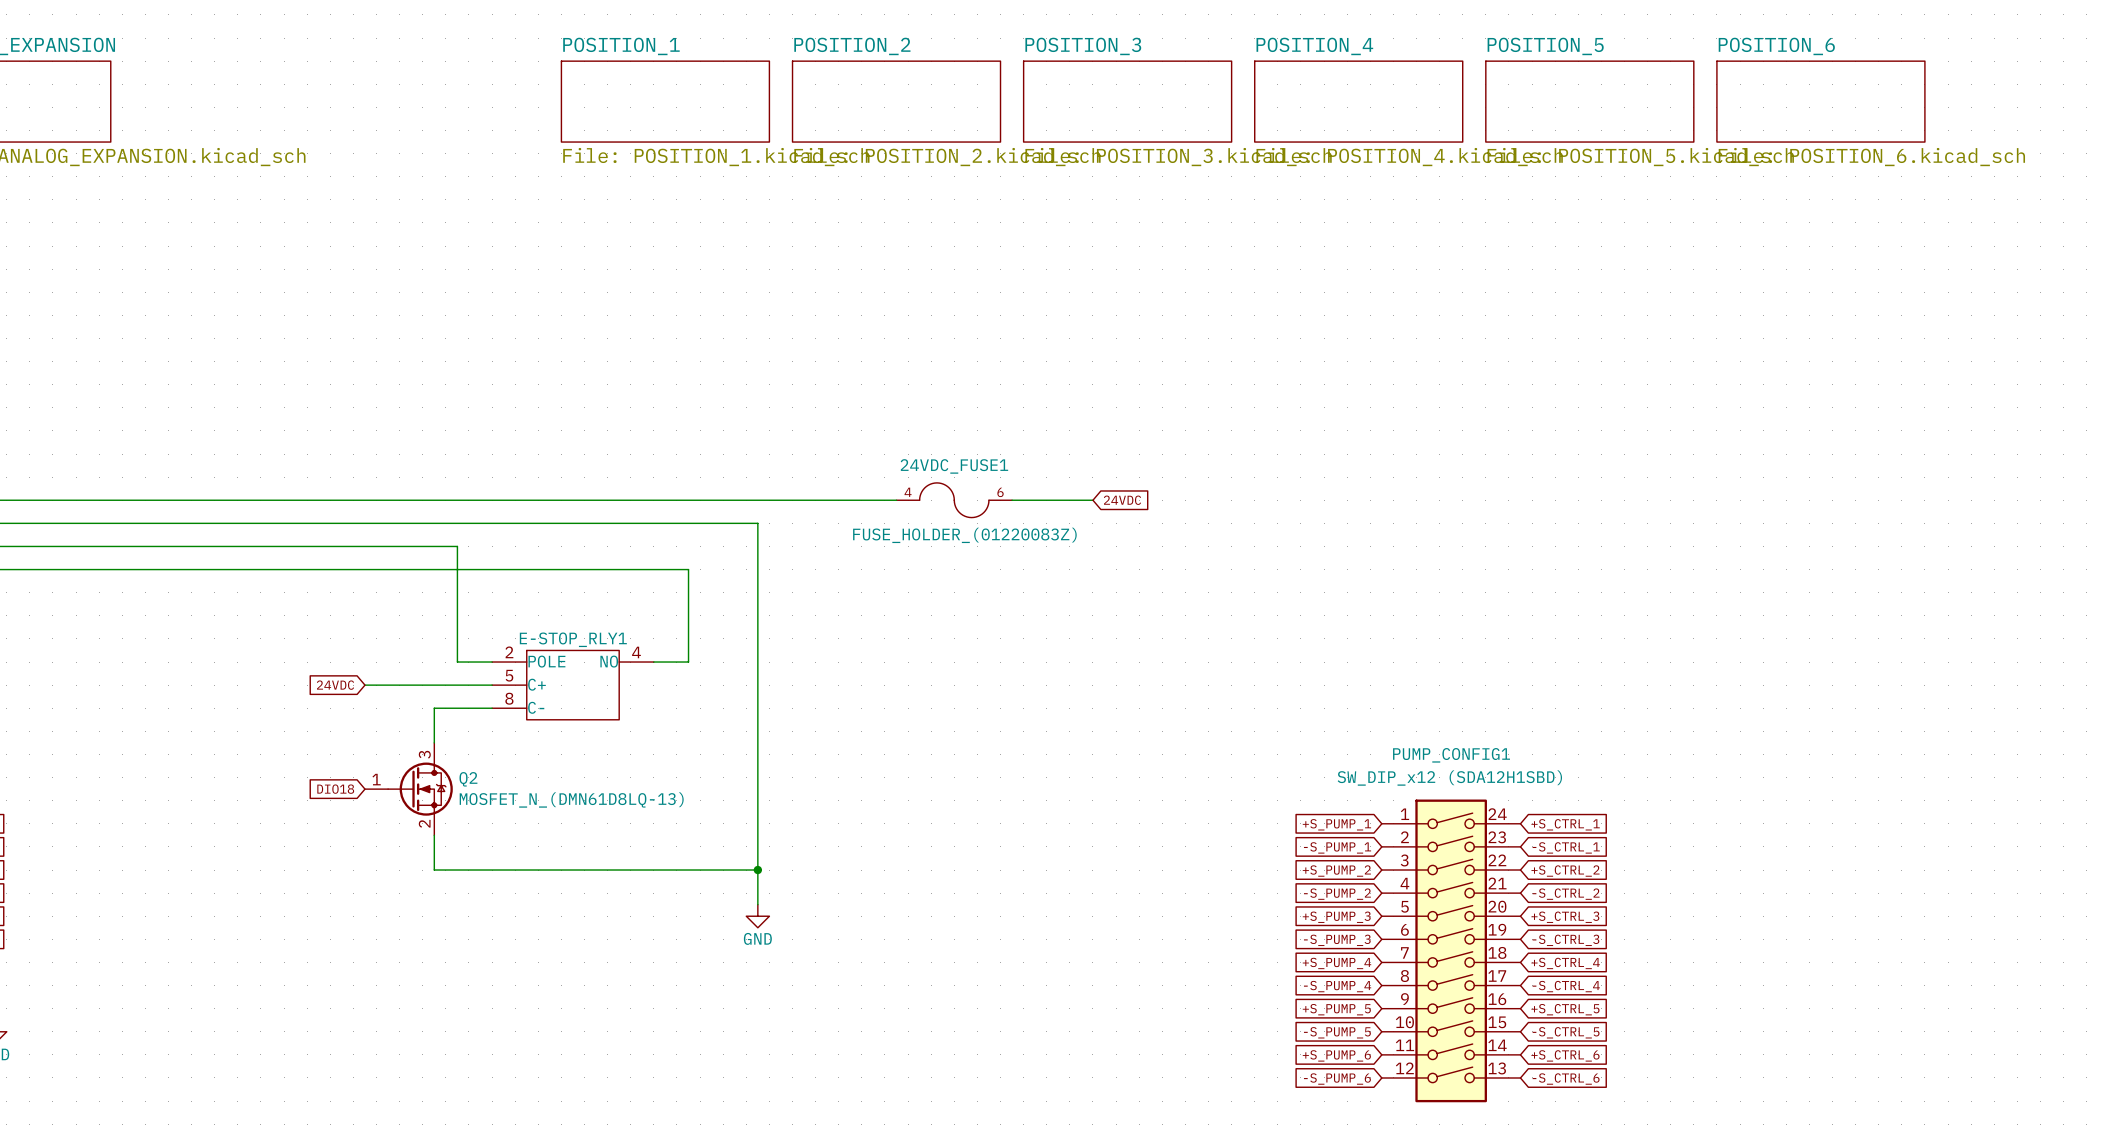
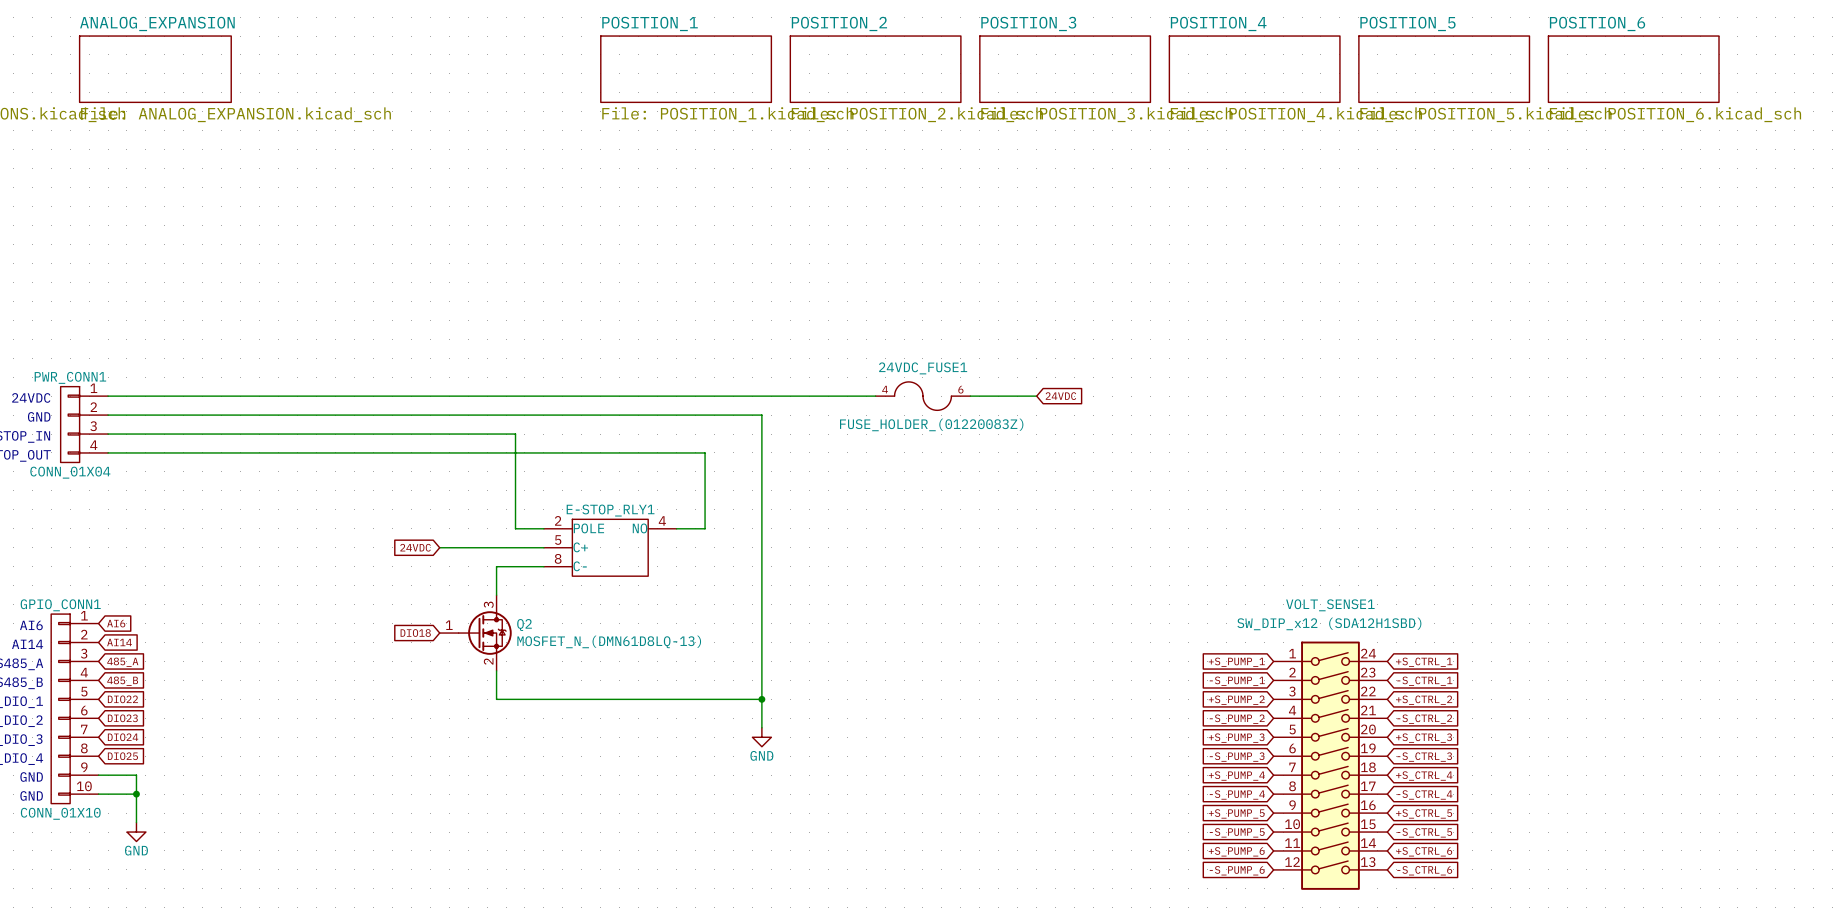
PUMP_CONFIG1 name: PUMP_CONFIG1 (1451, 755) -> VOLT_SENSE1 (1330, 605)

